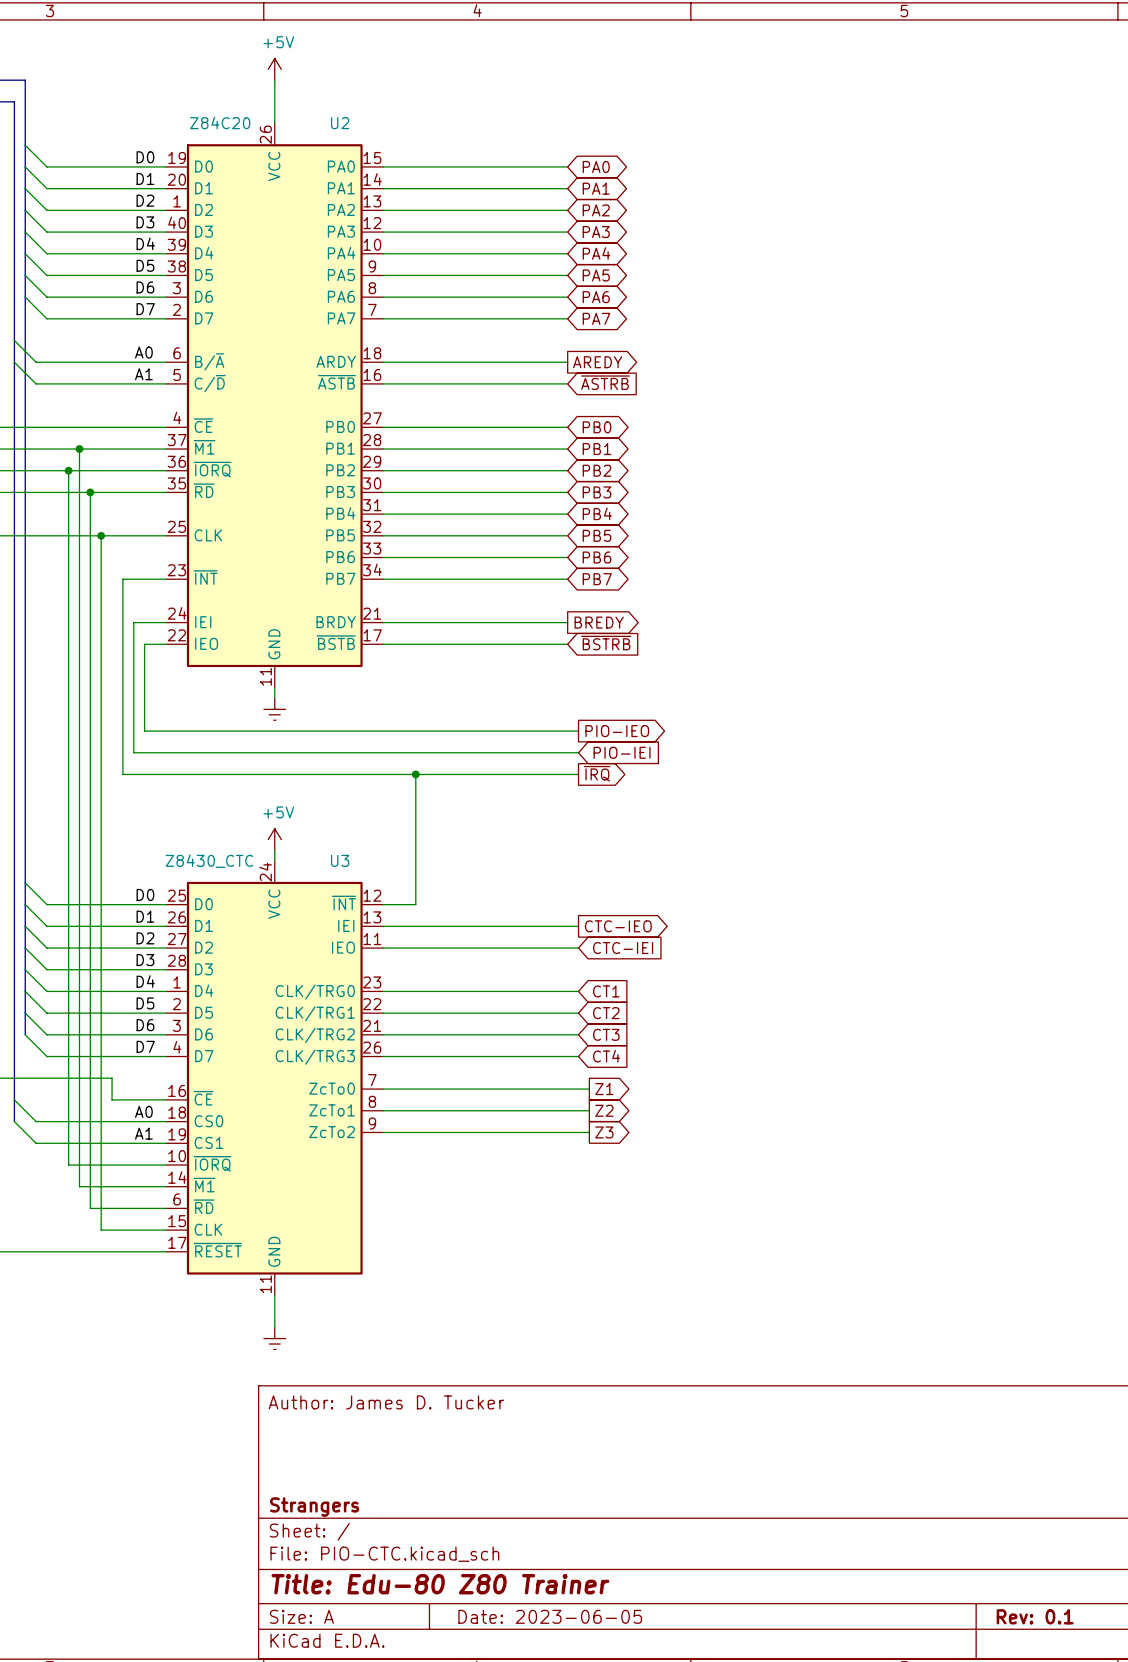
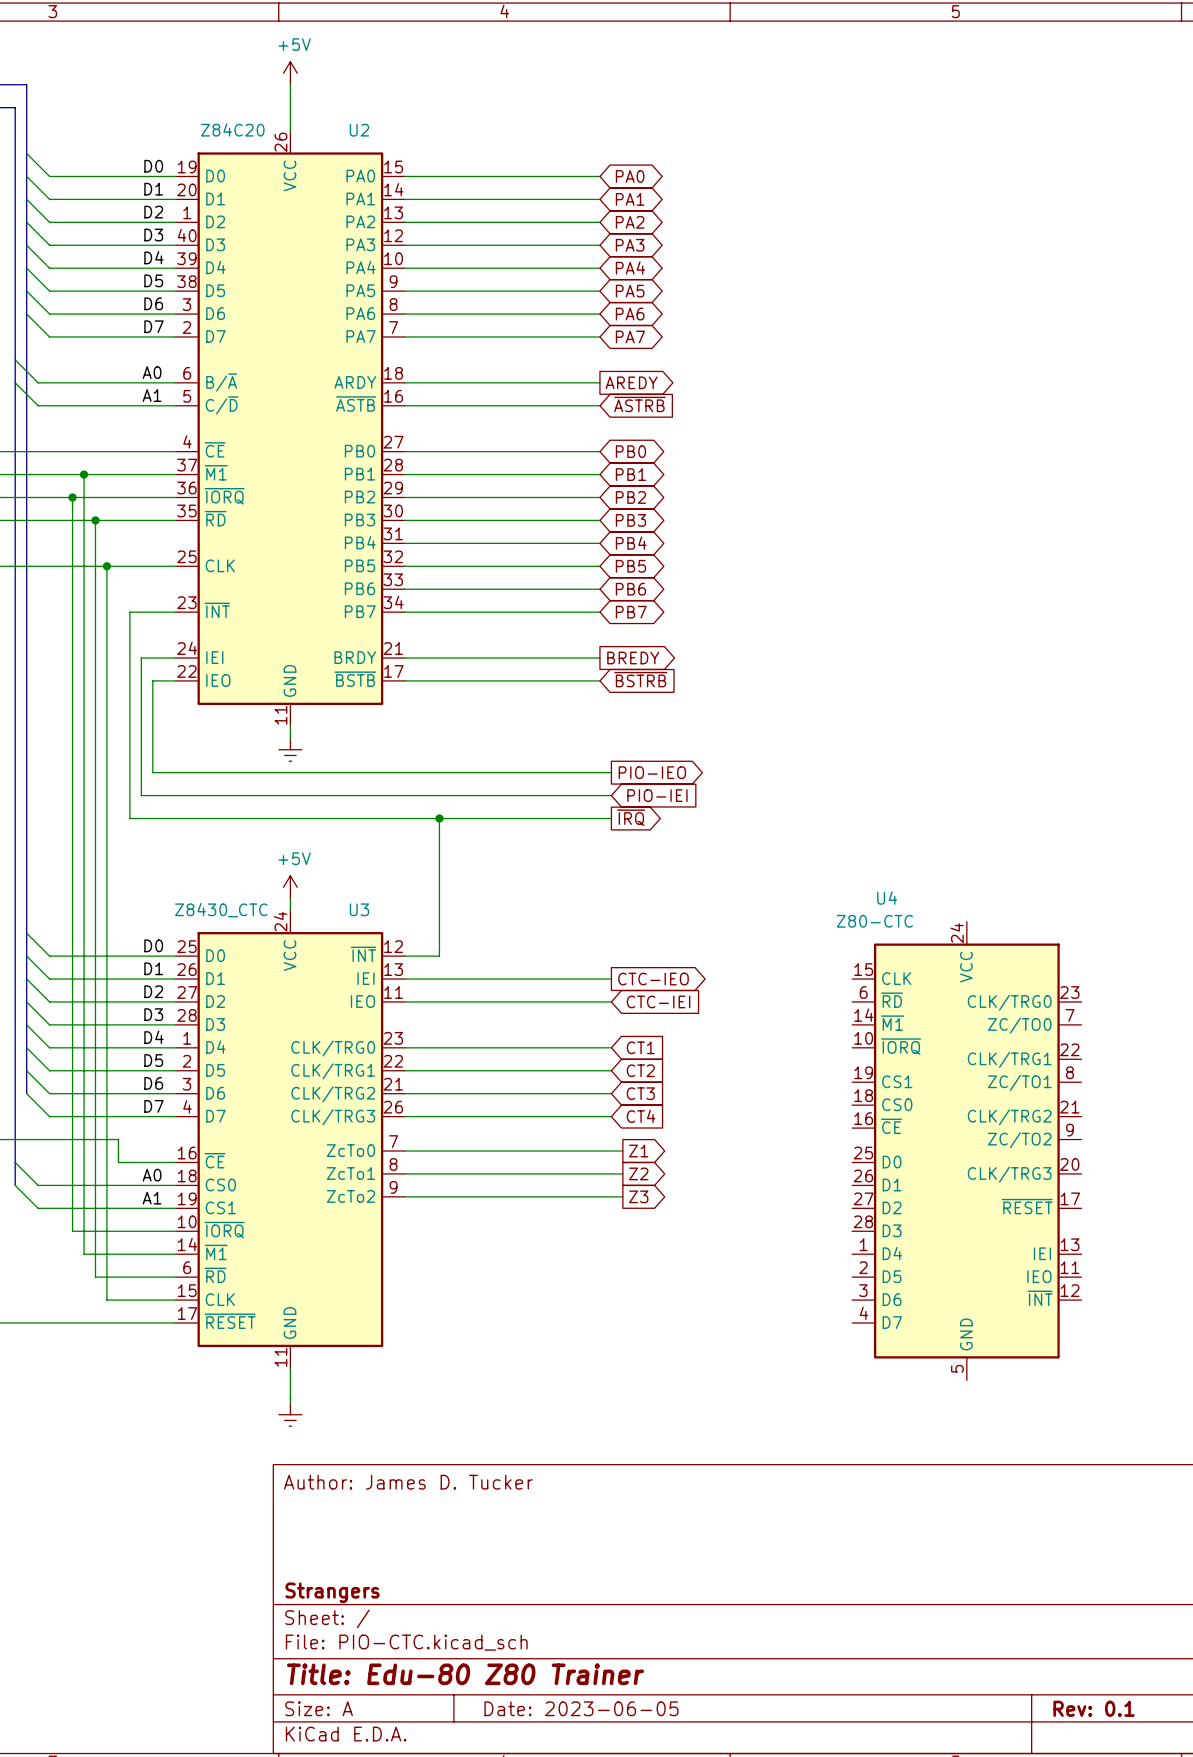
U4: none -> Z80-CTC (966, 1151)

